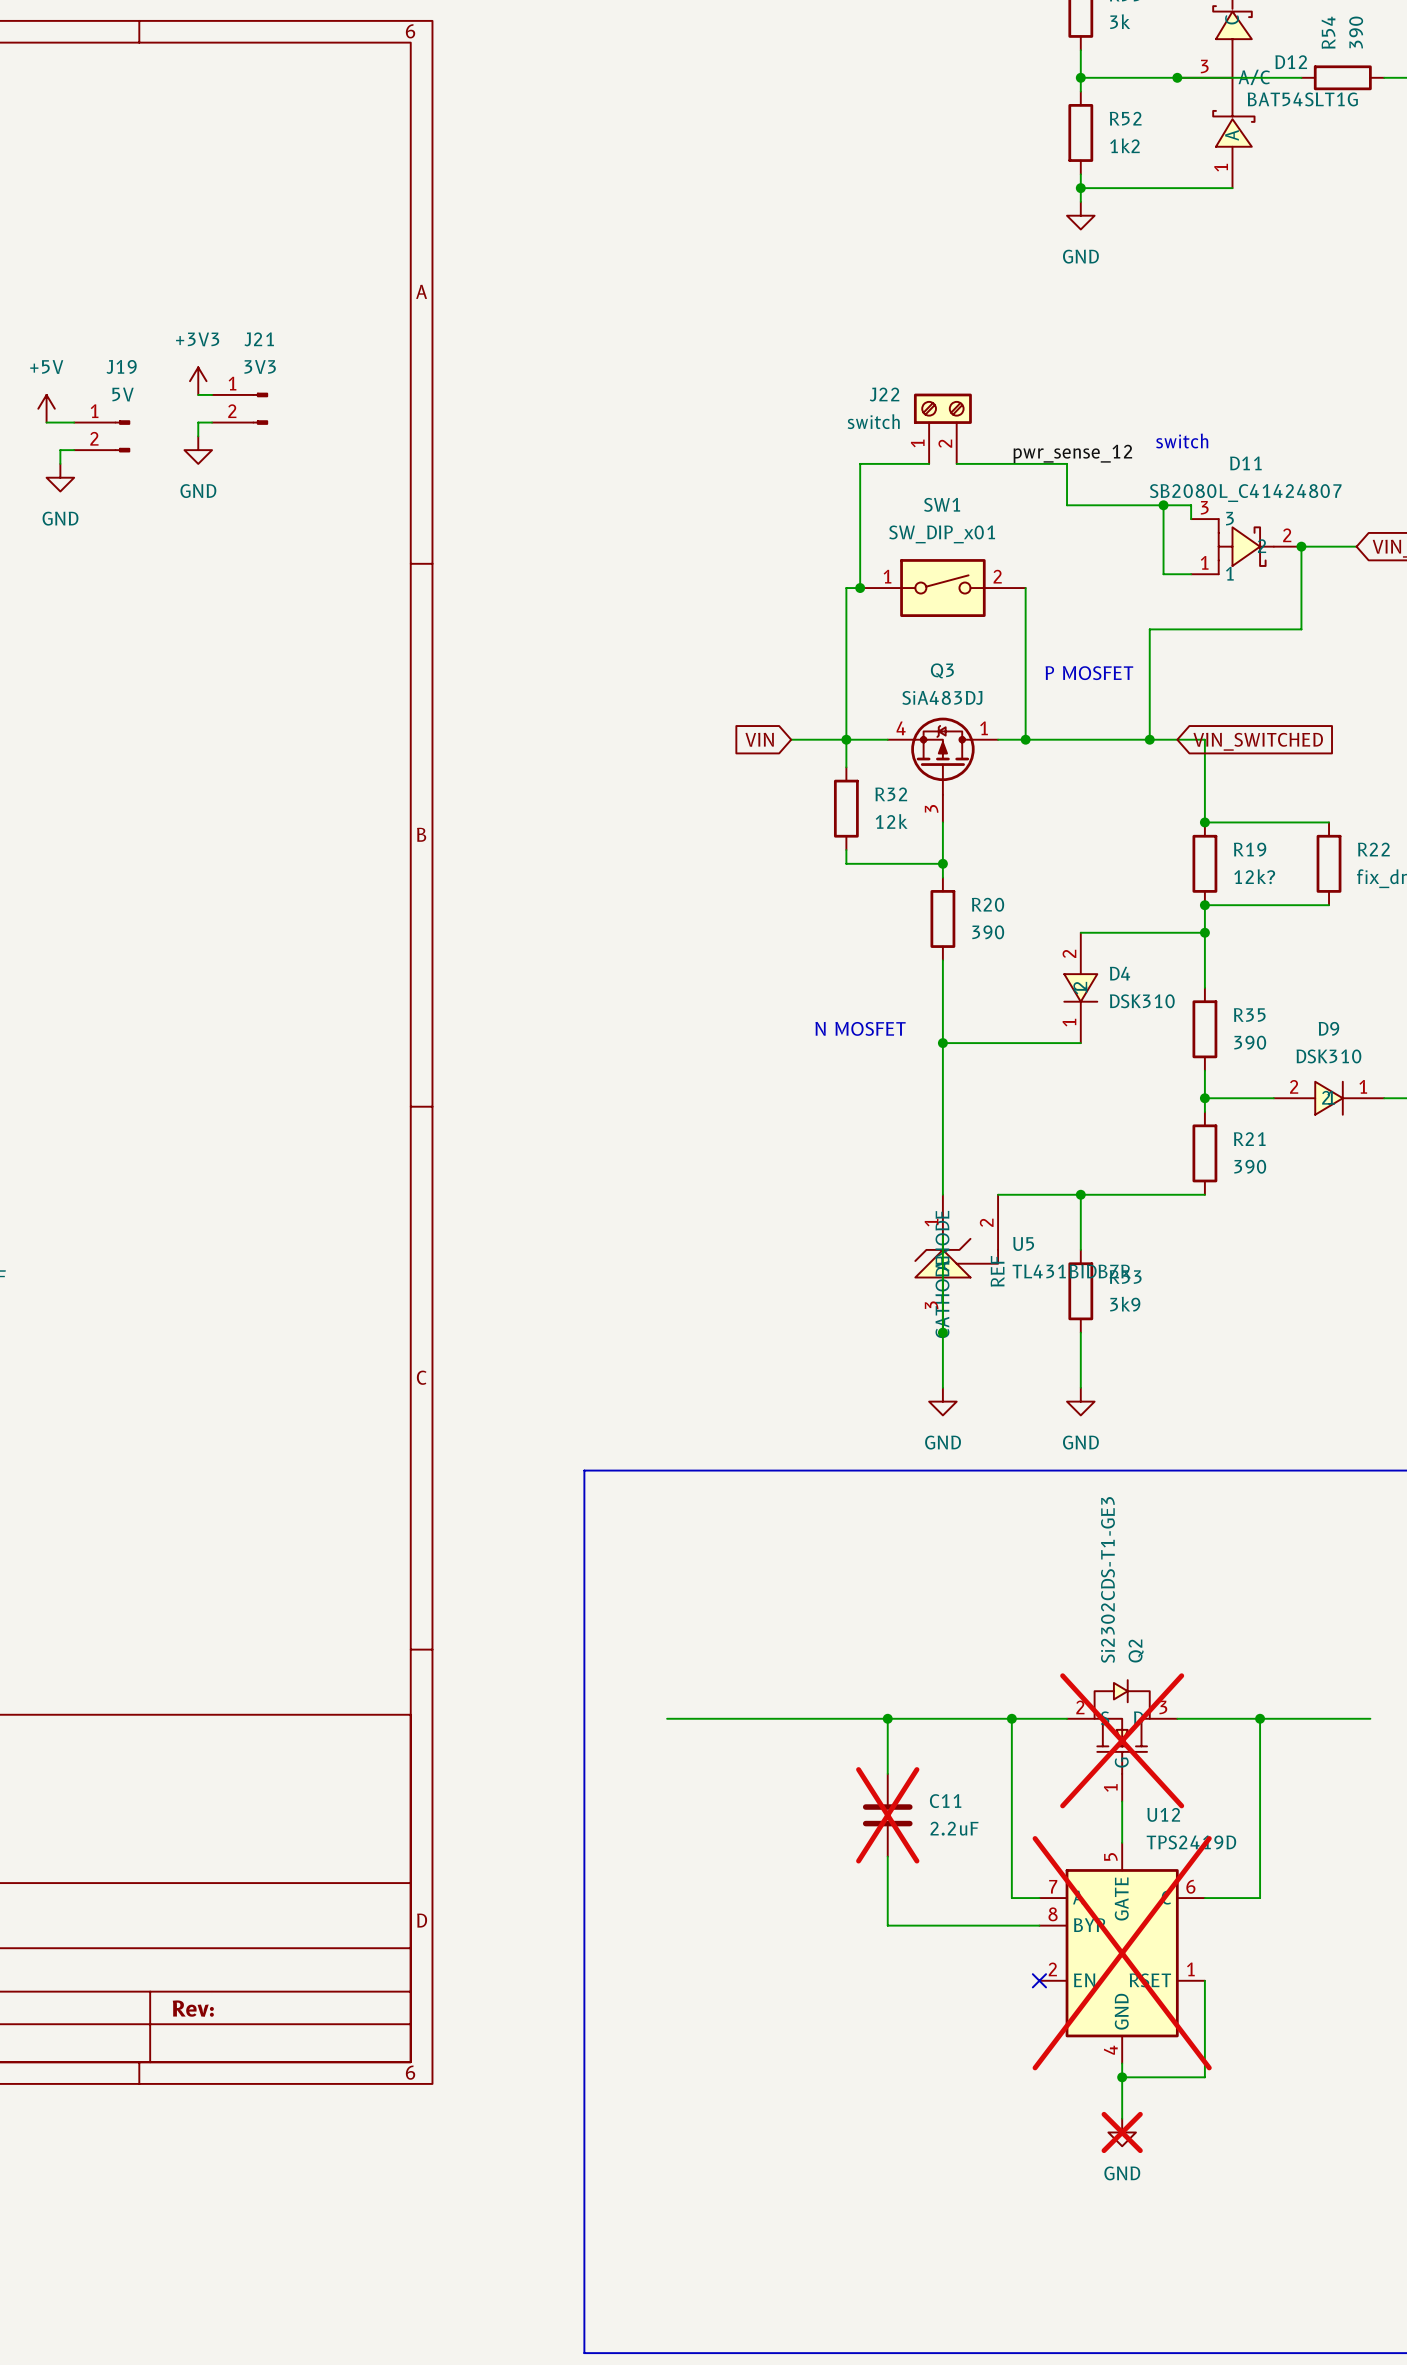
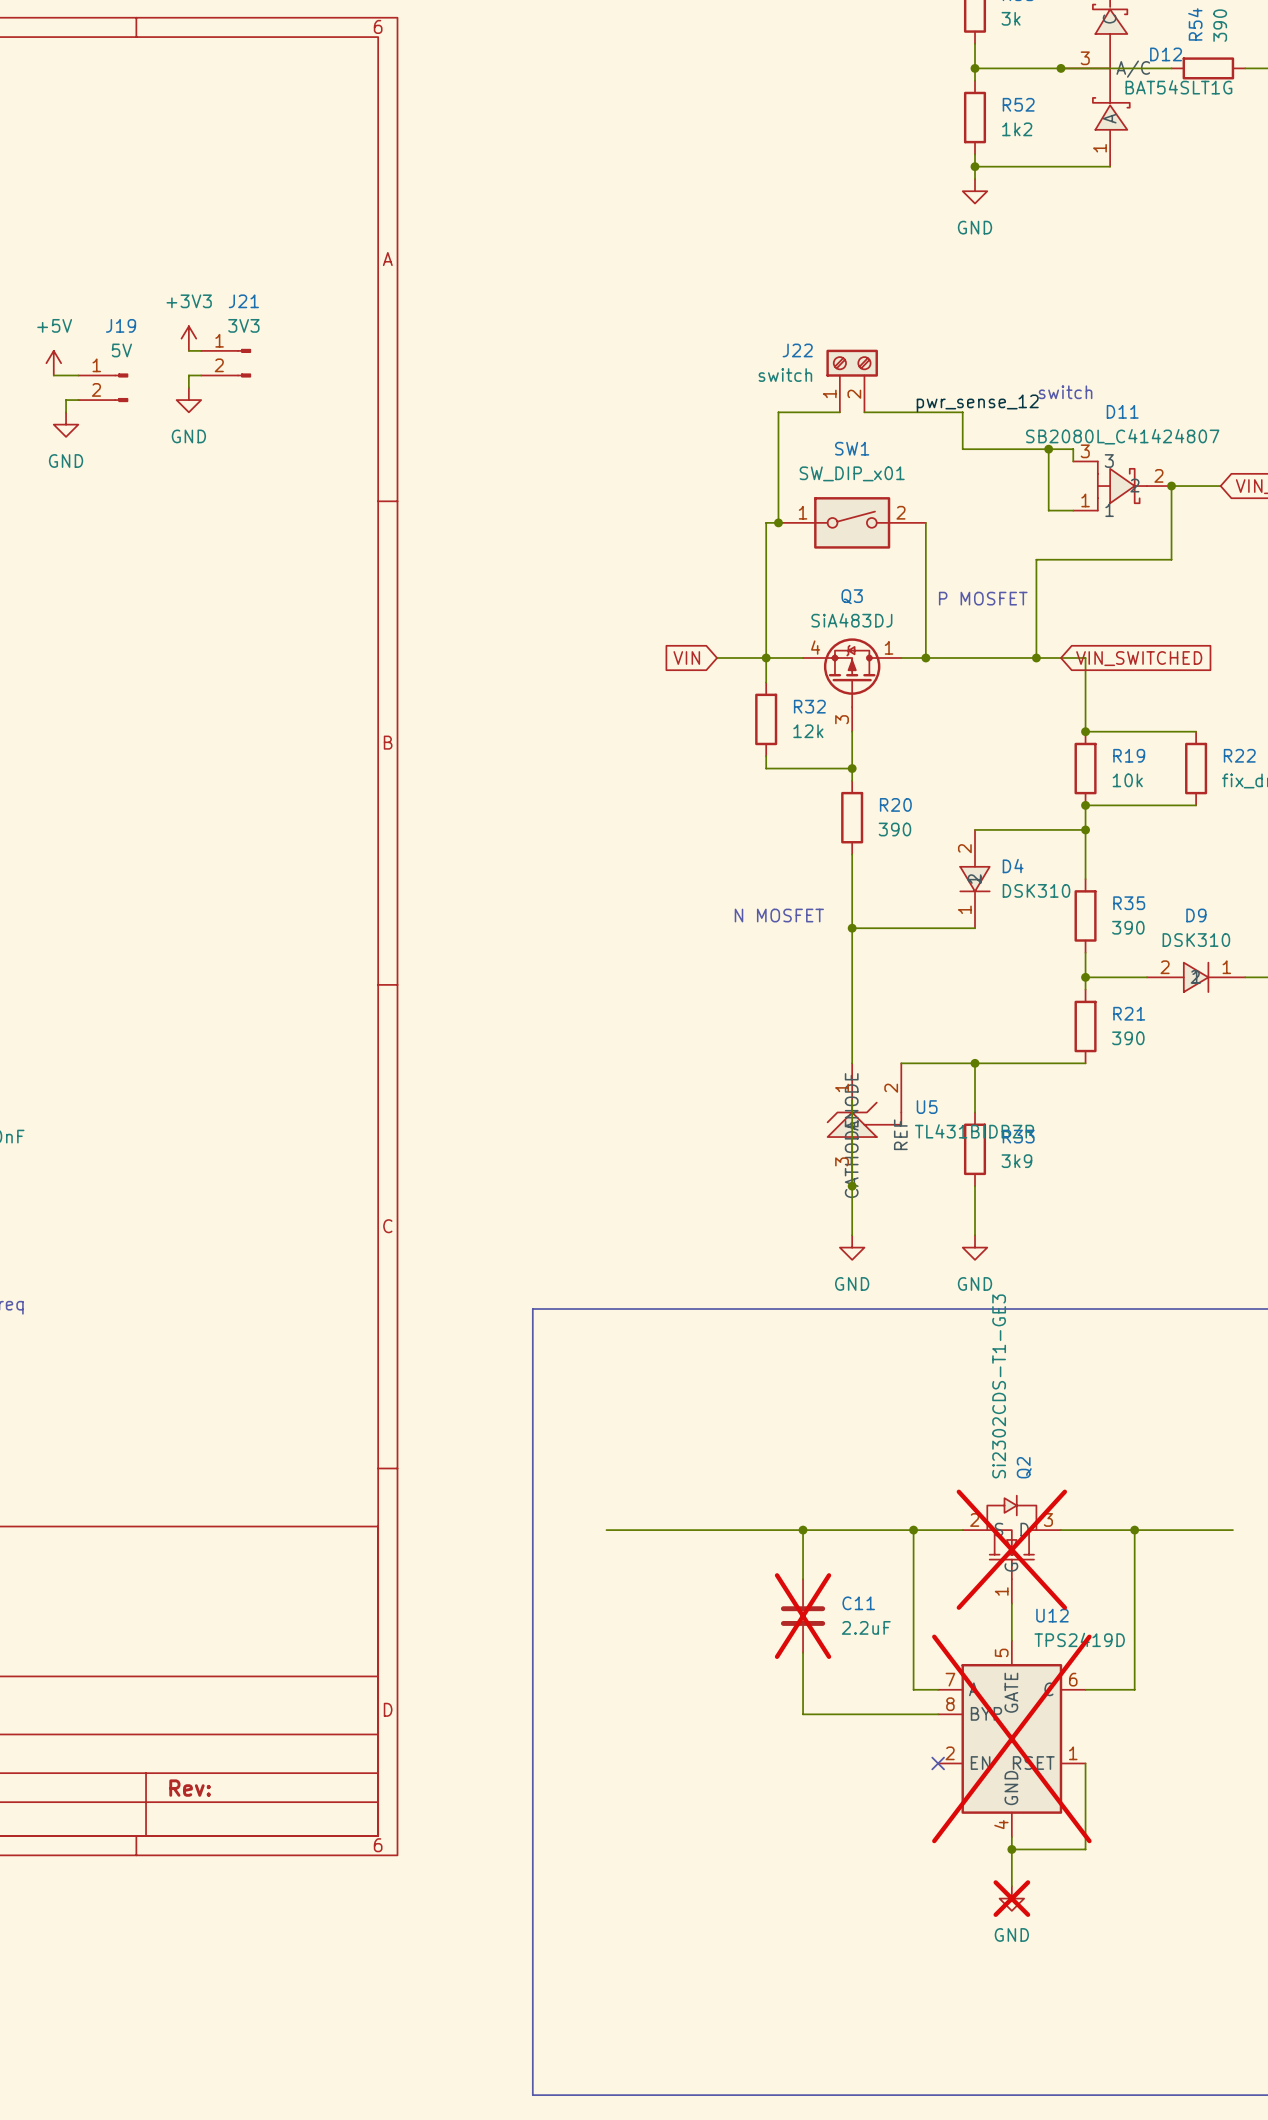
R19 value: 12k? (1254, 876) -> 10k (1127, 780)

